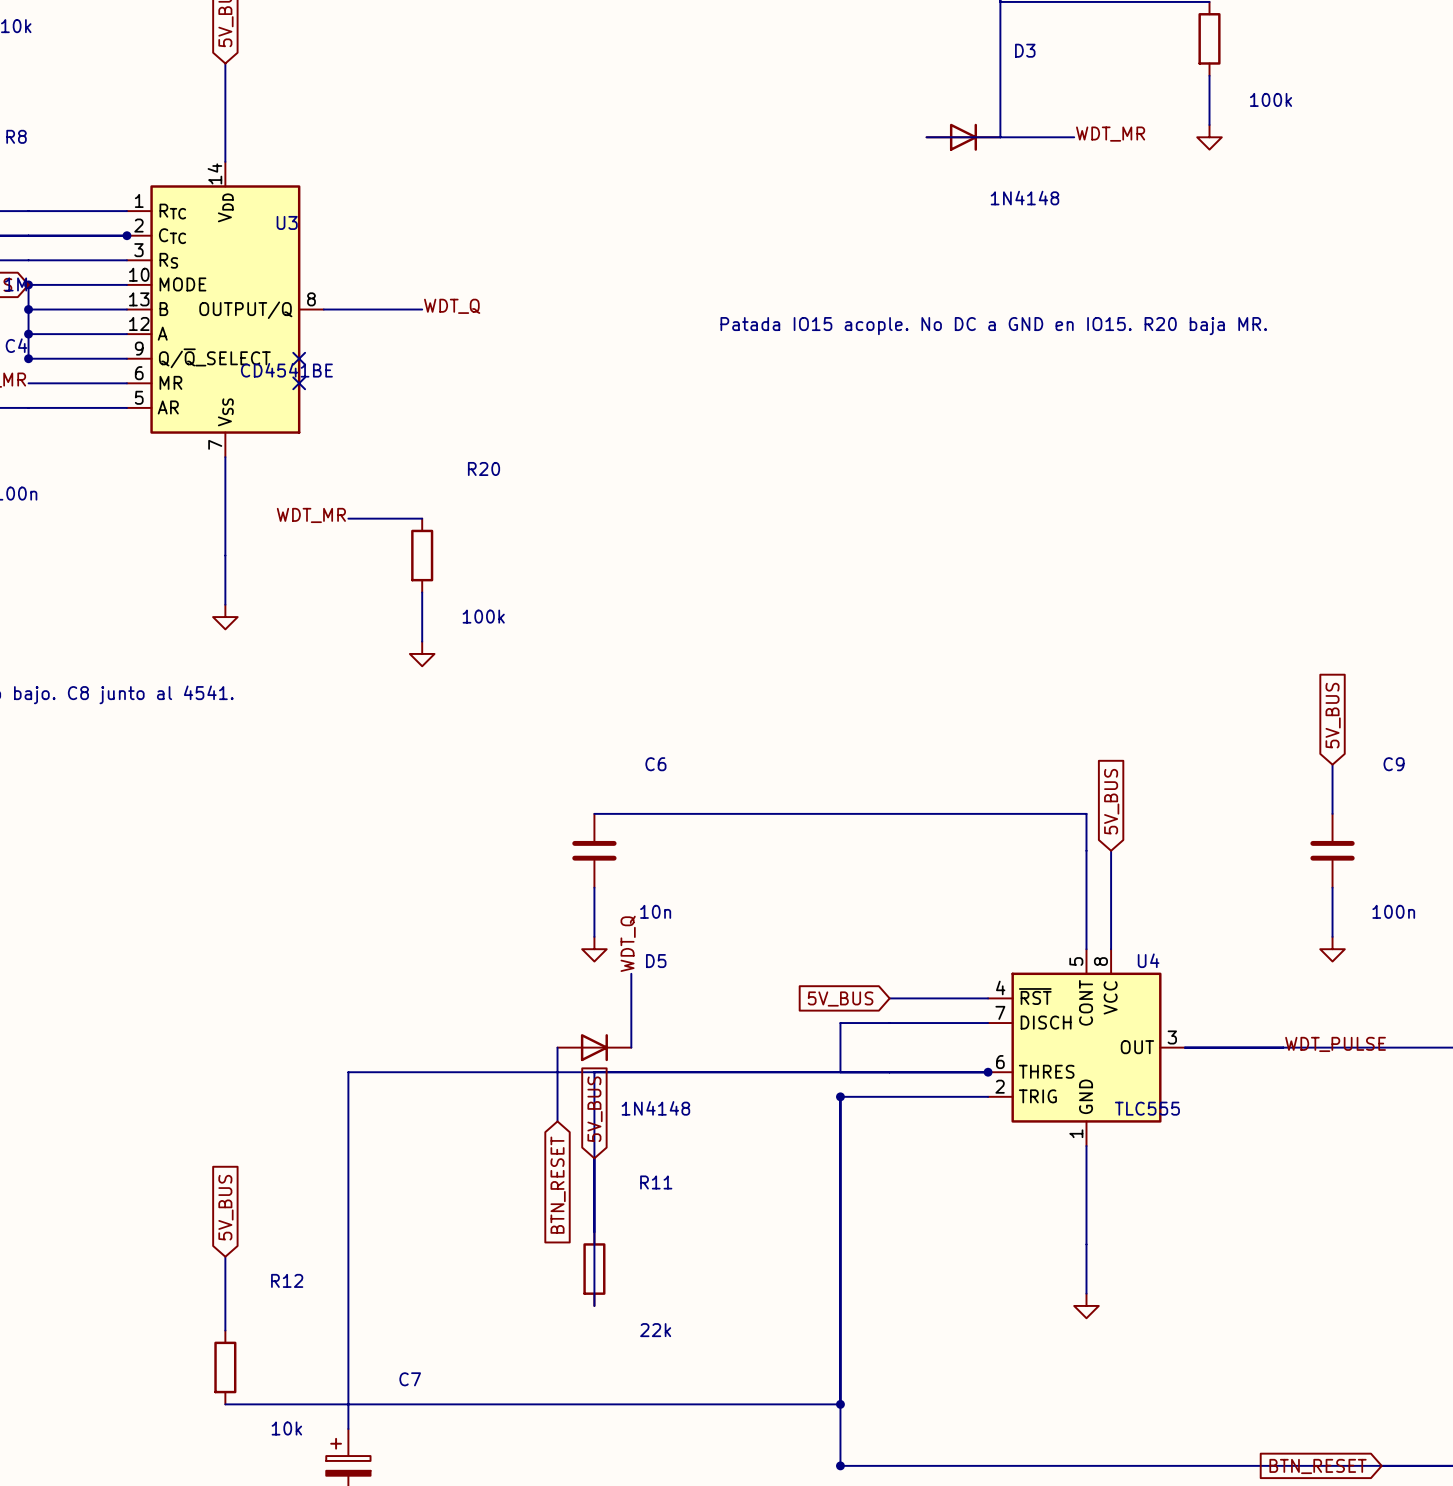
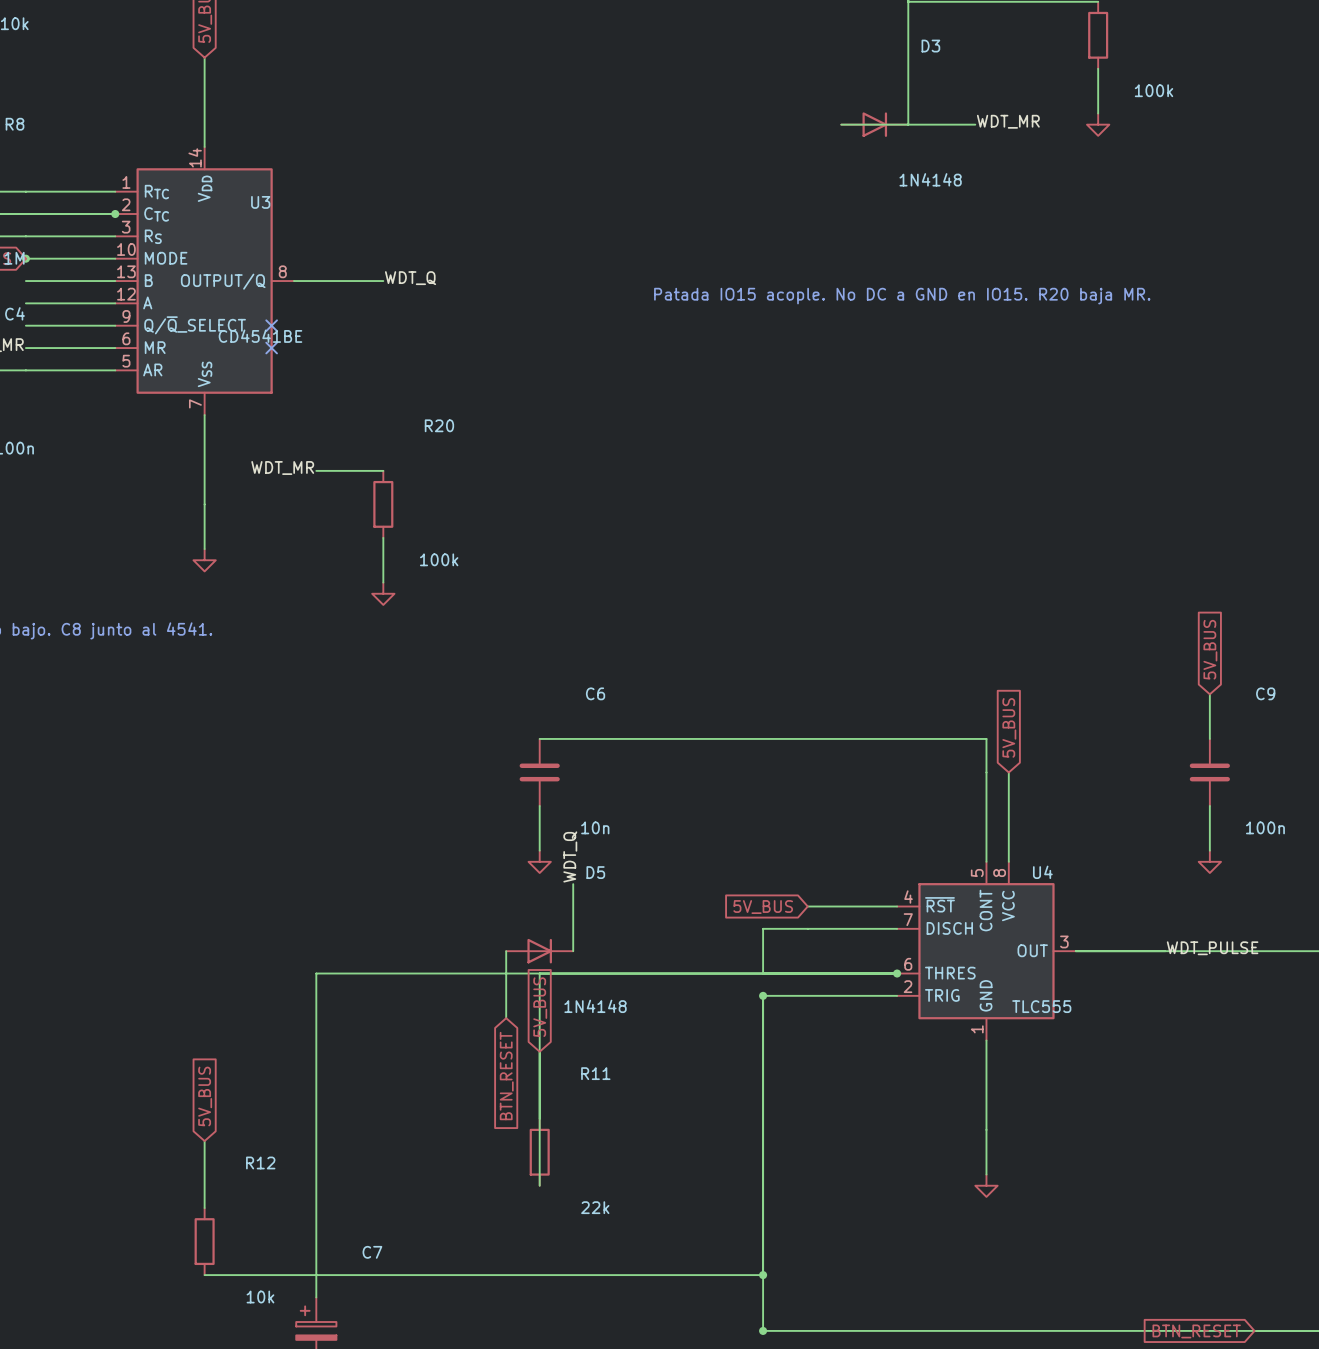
wire: (28, 284) (28, 358) -> none
junction: (28, 309) -> none
junction: (28, 334) -> none
junction: (28, 358) -> none

